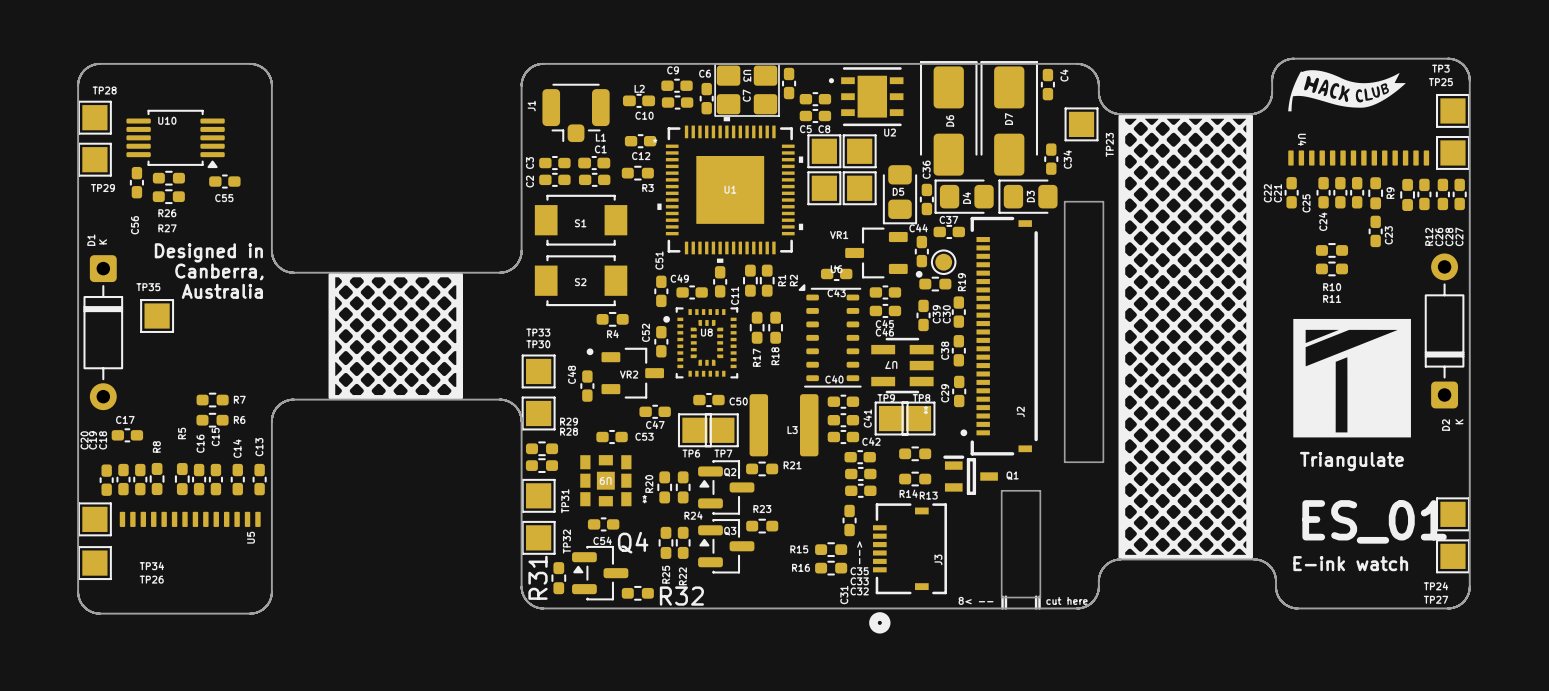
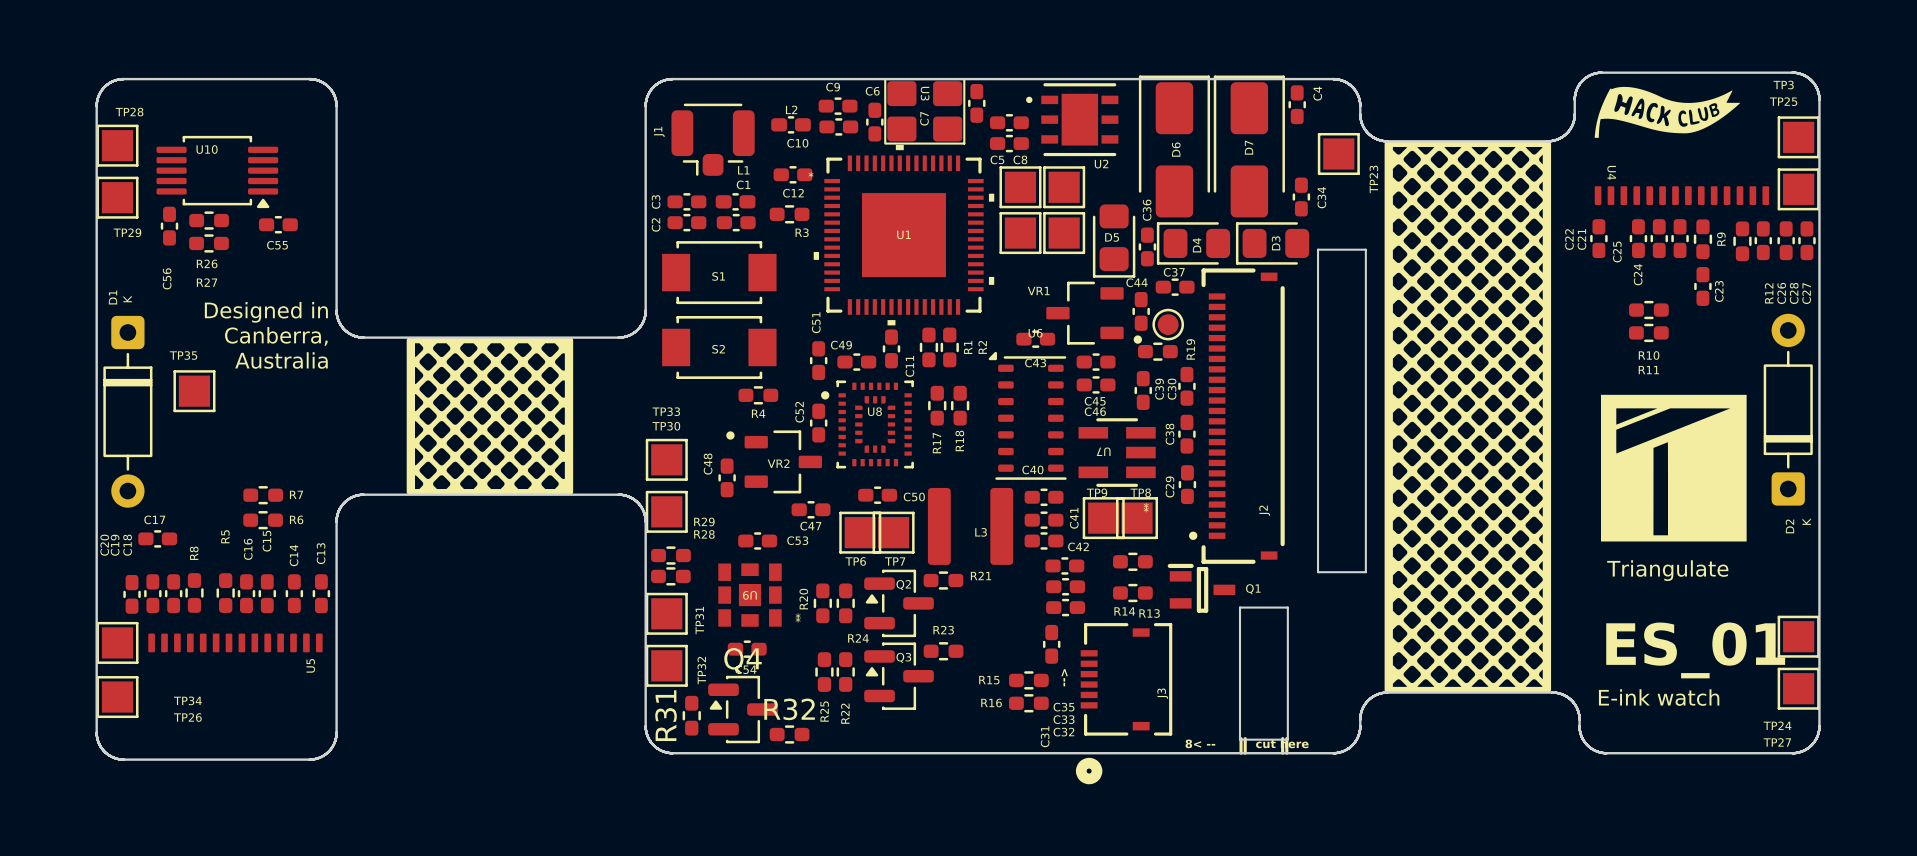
Q4 name position: Q4 (633, 542) -> Q4 (742, 660)
R32 name position: R32 (681, 596) -> R32 (789, 709)

